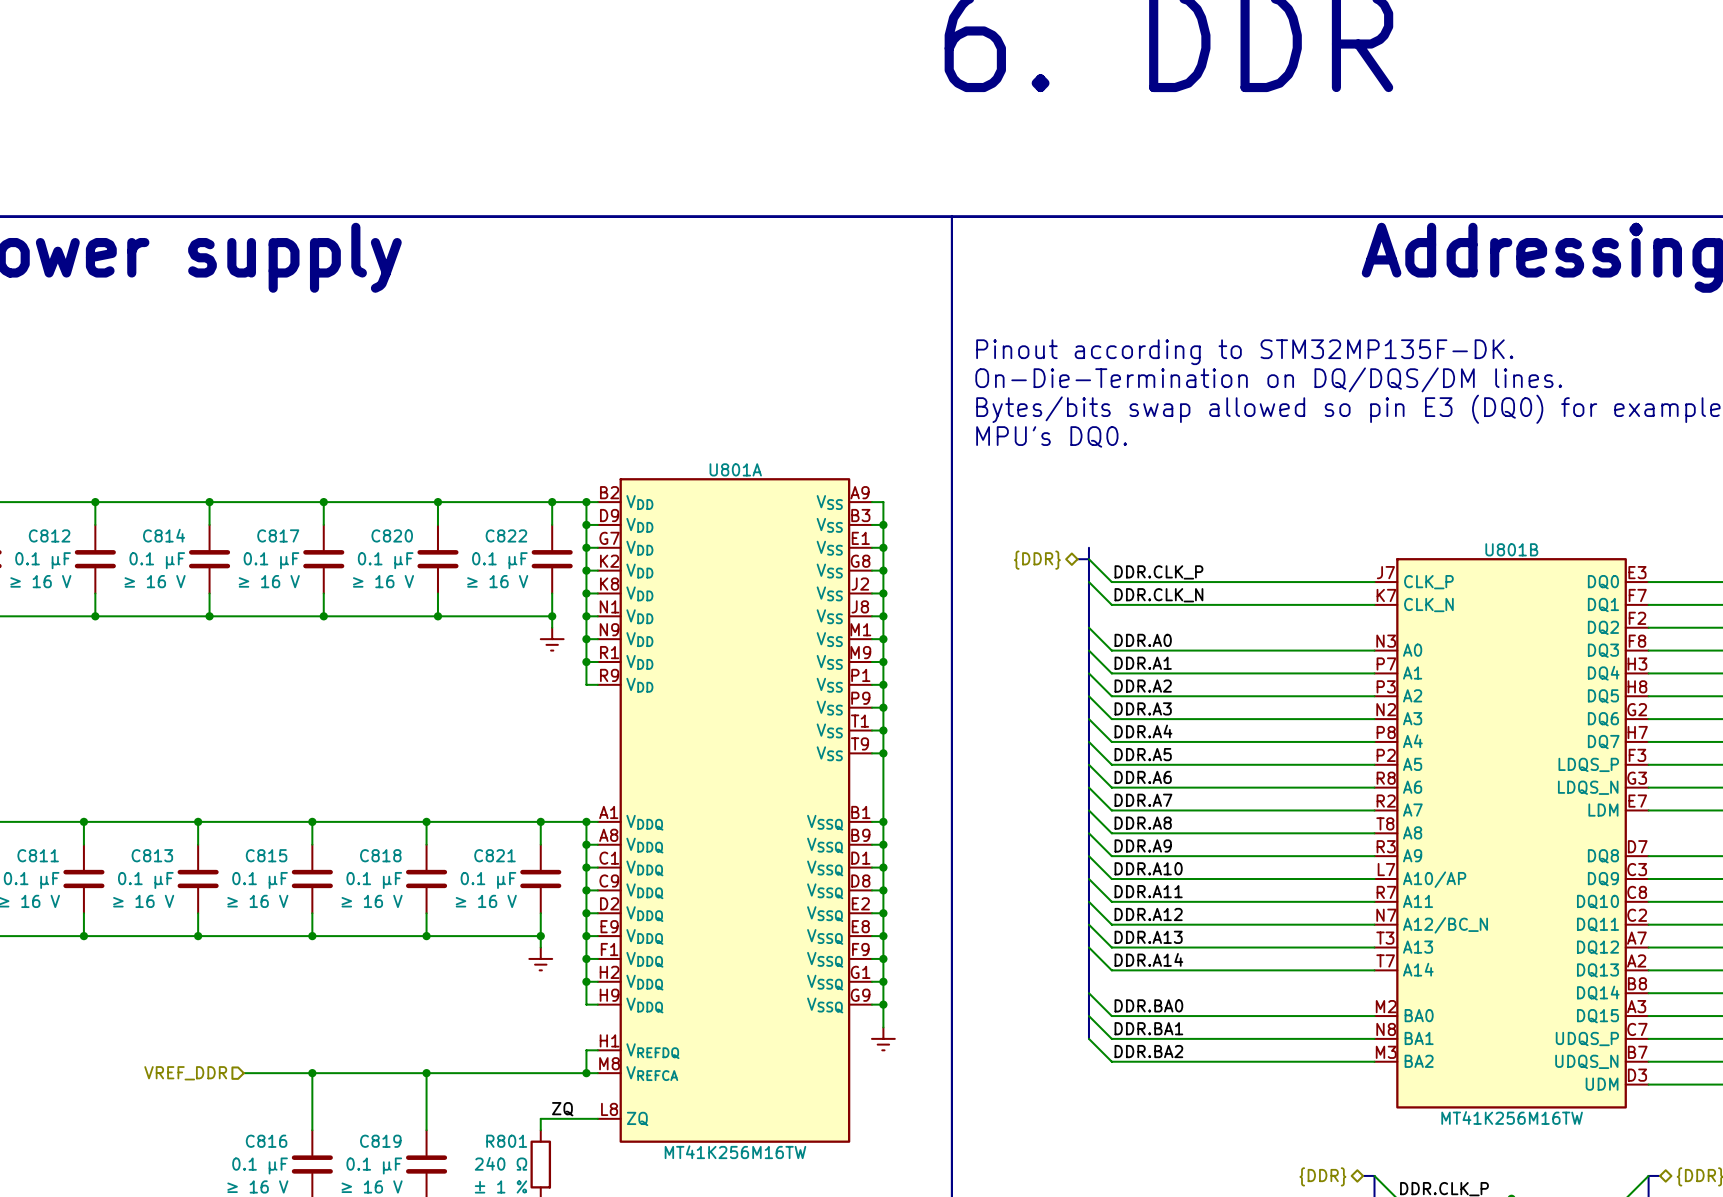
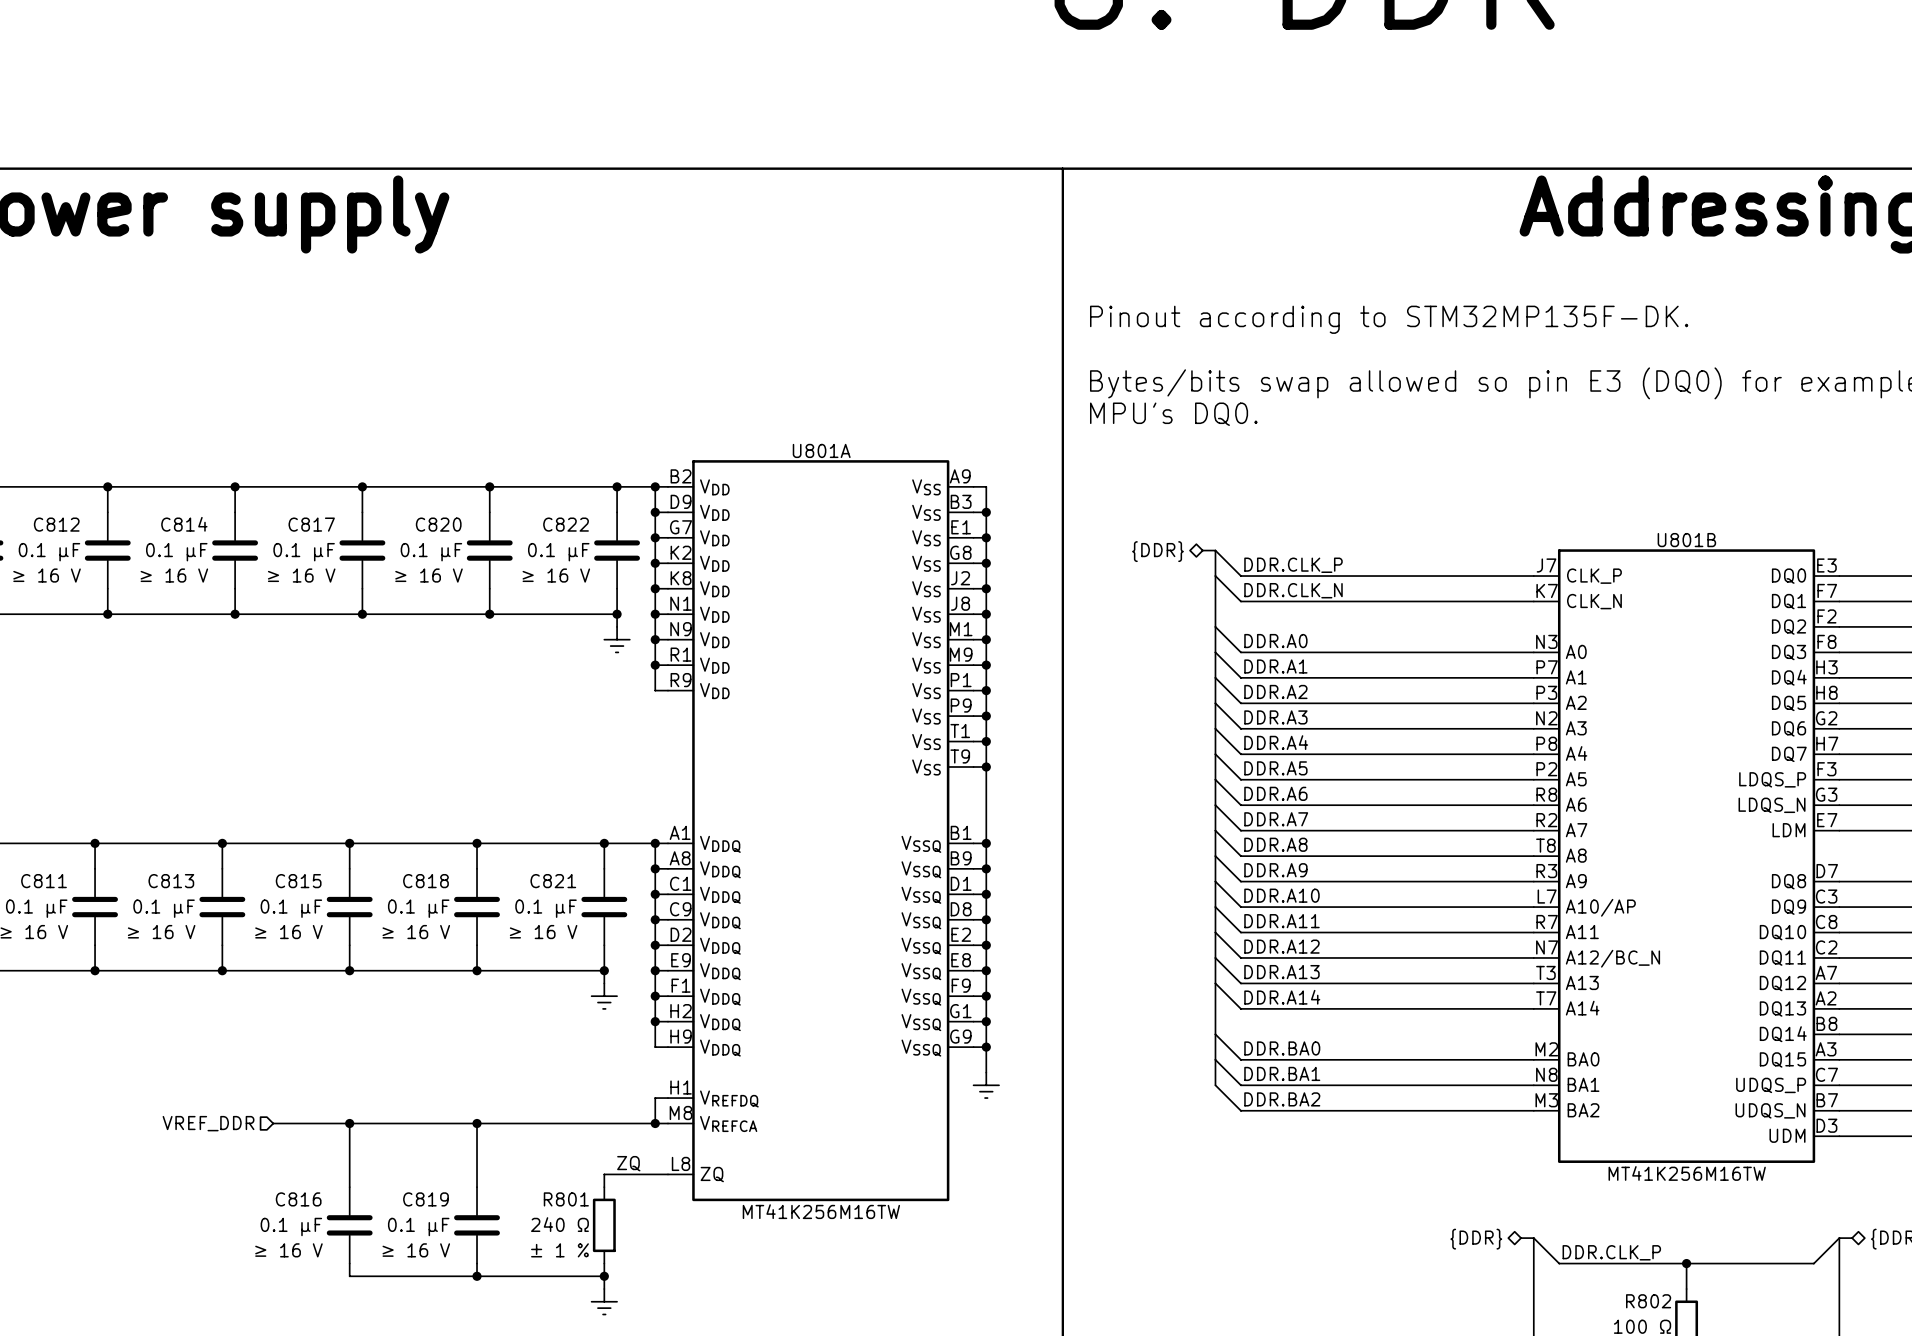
text: On-Die-Termination on DQ/DQS/DM lines. (1268, 379) -> none
bus: (1088, 547) (1088, 559) -> none

